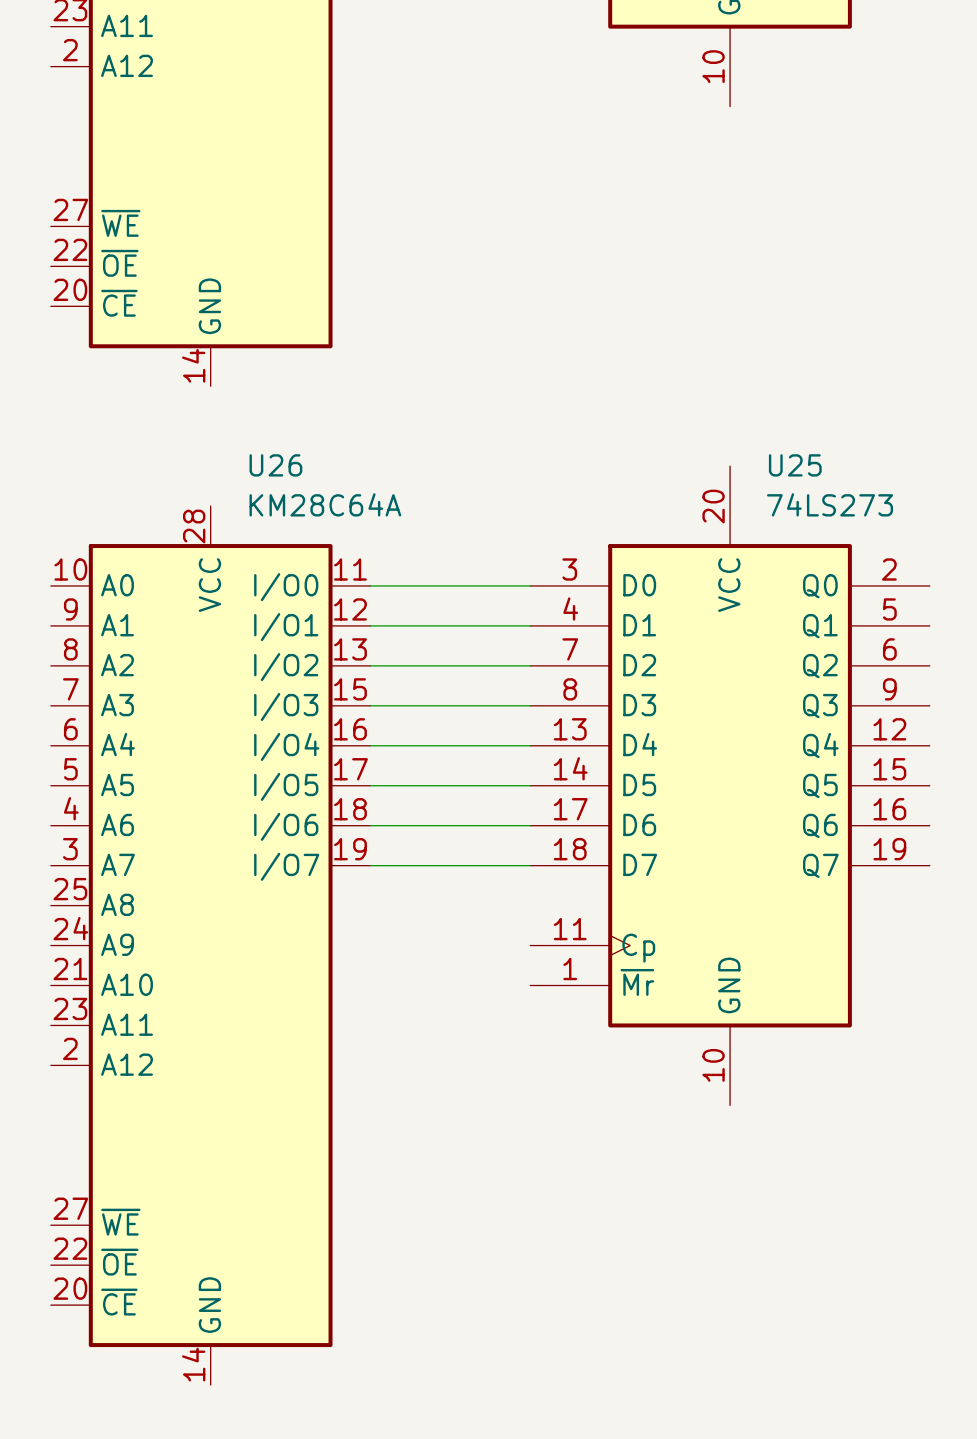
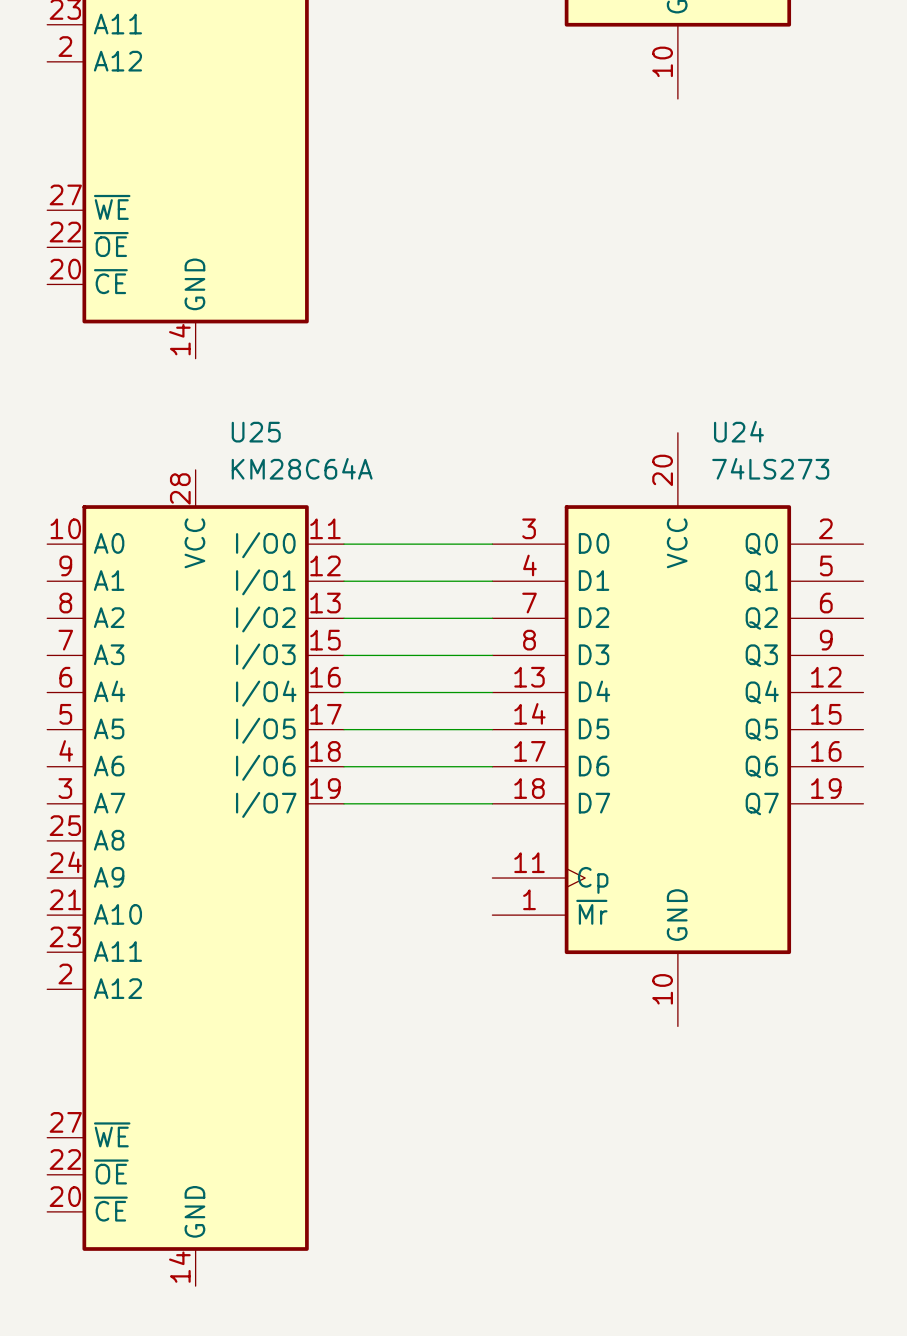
U26 name: U26 (275, 465) -> U25 (256, 432)
U25 name: U25 (795, 465) -> U24 (738, 431)

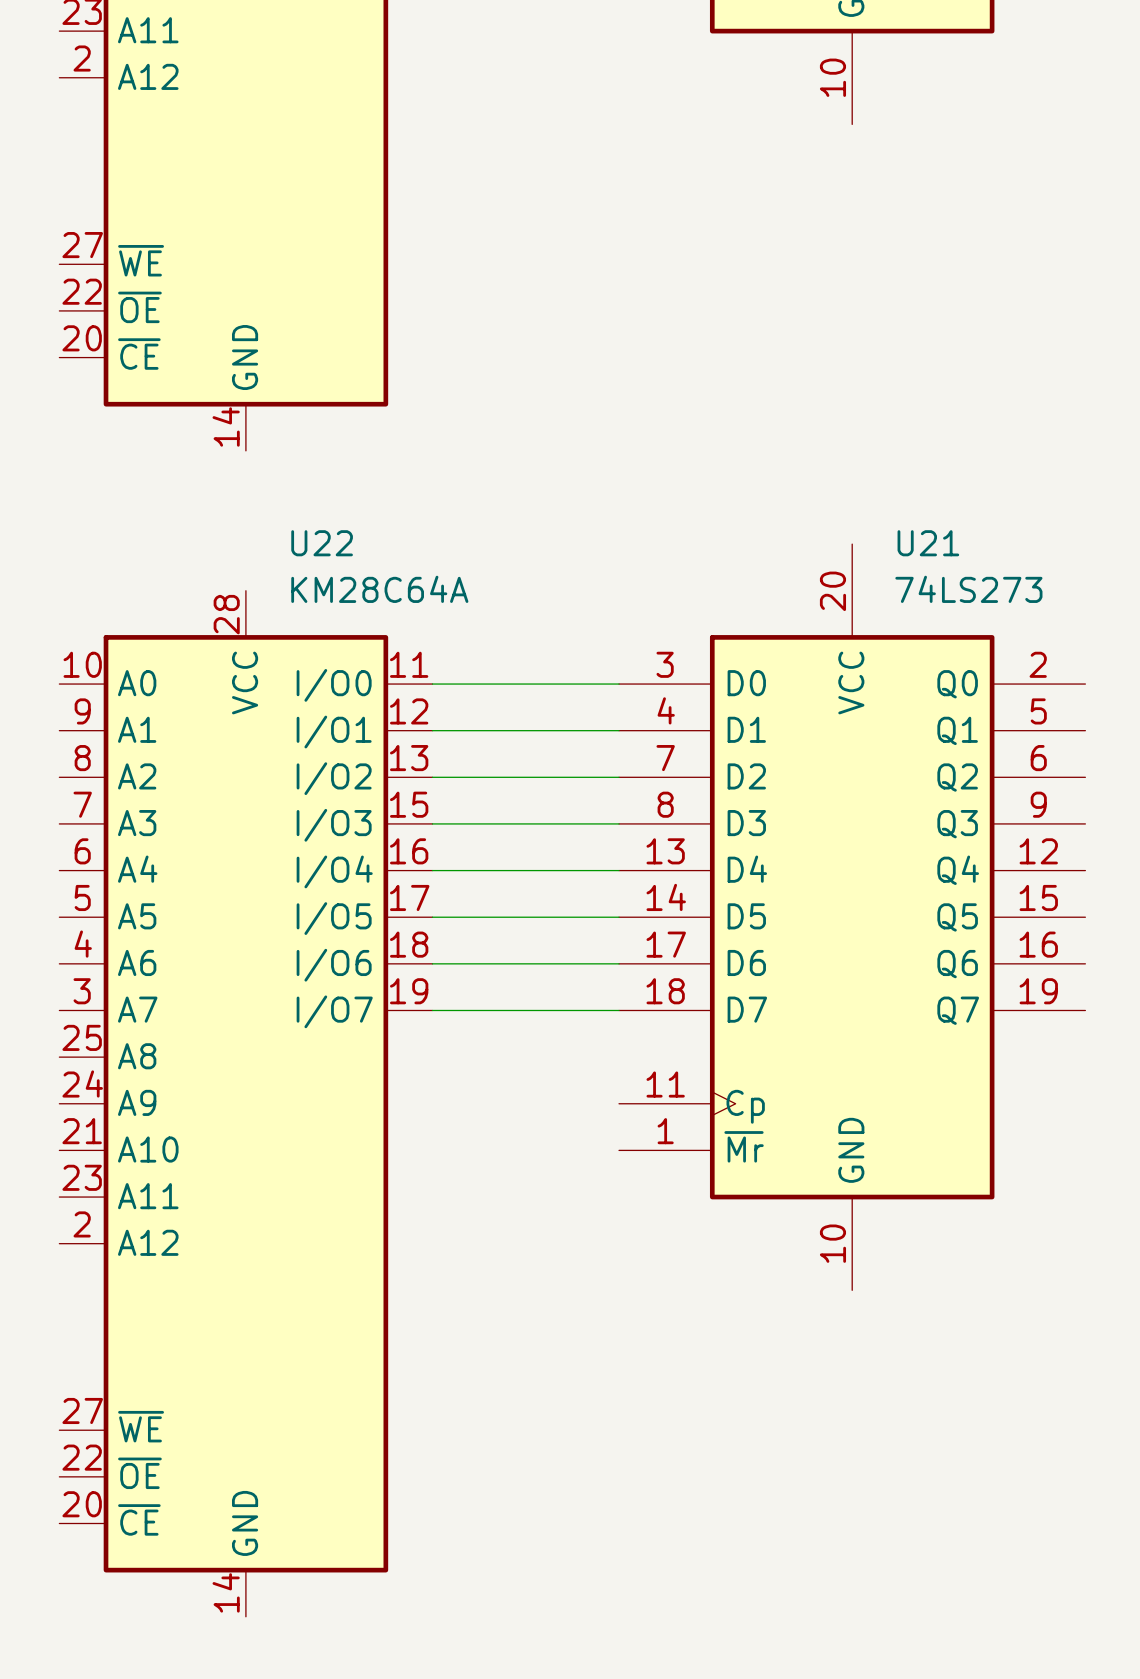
U24 name: U24 (738, 431) -> U21 (928, 543)
U25 name: U25 (256, 432) -> U22 (322, 543)

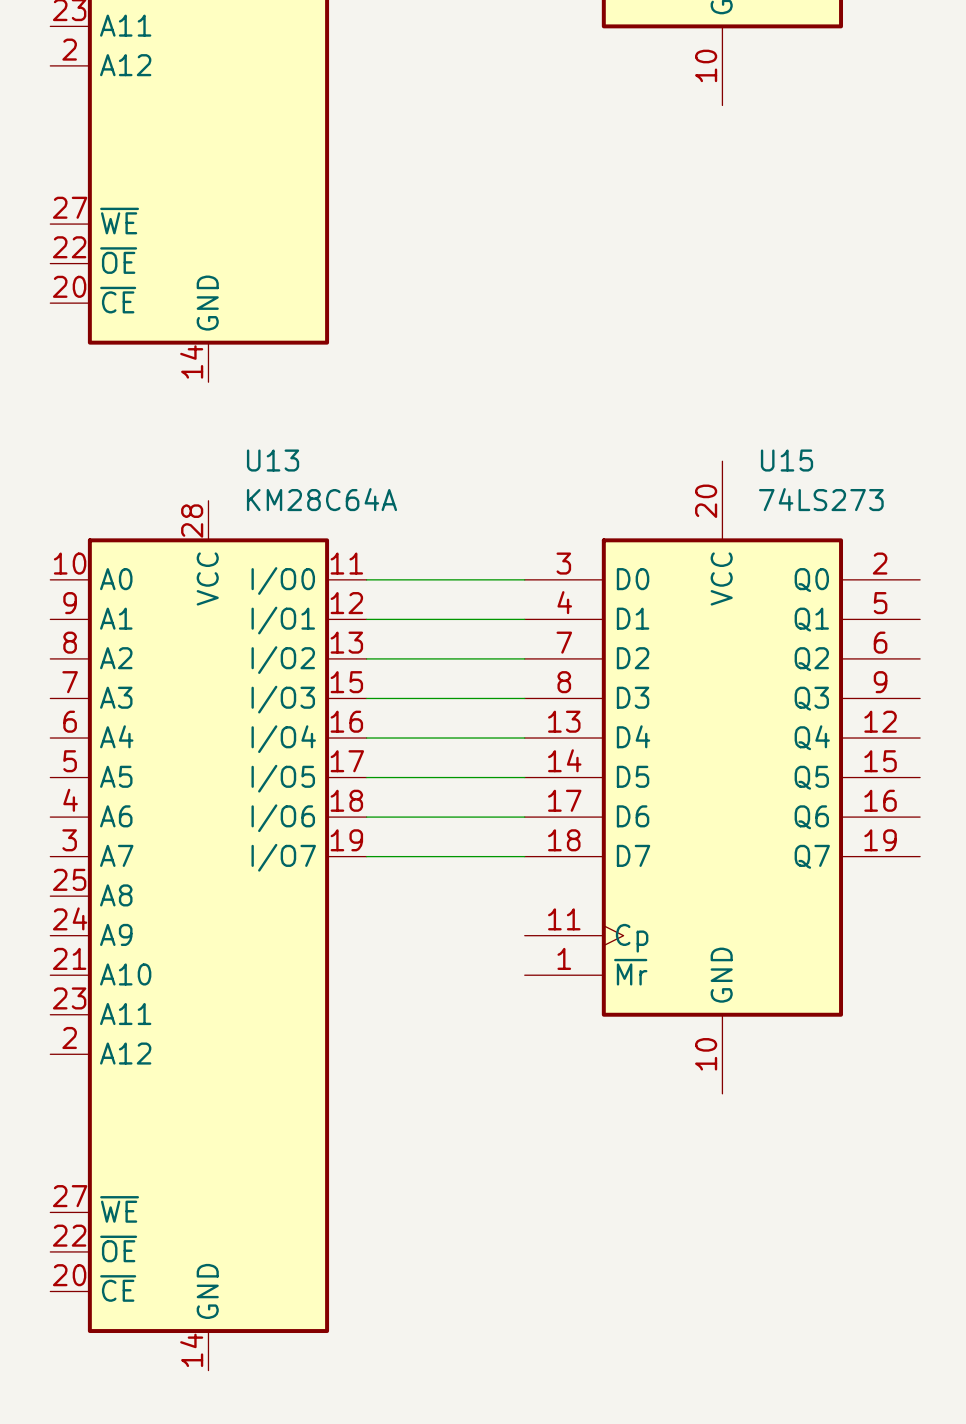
U22 name: U22 (322, 543) -> U13 (273, 460)
U21 name: U21 (928, 543) -> U15 (786, 460)

